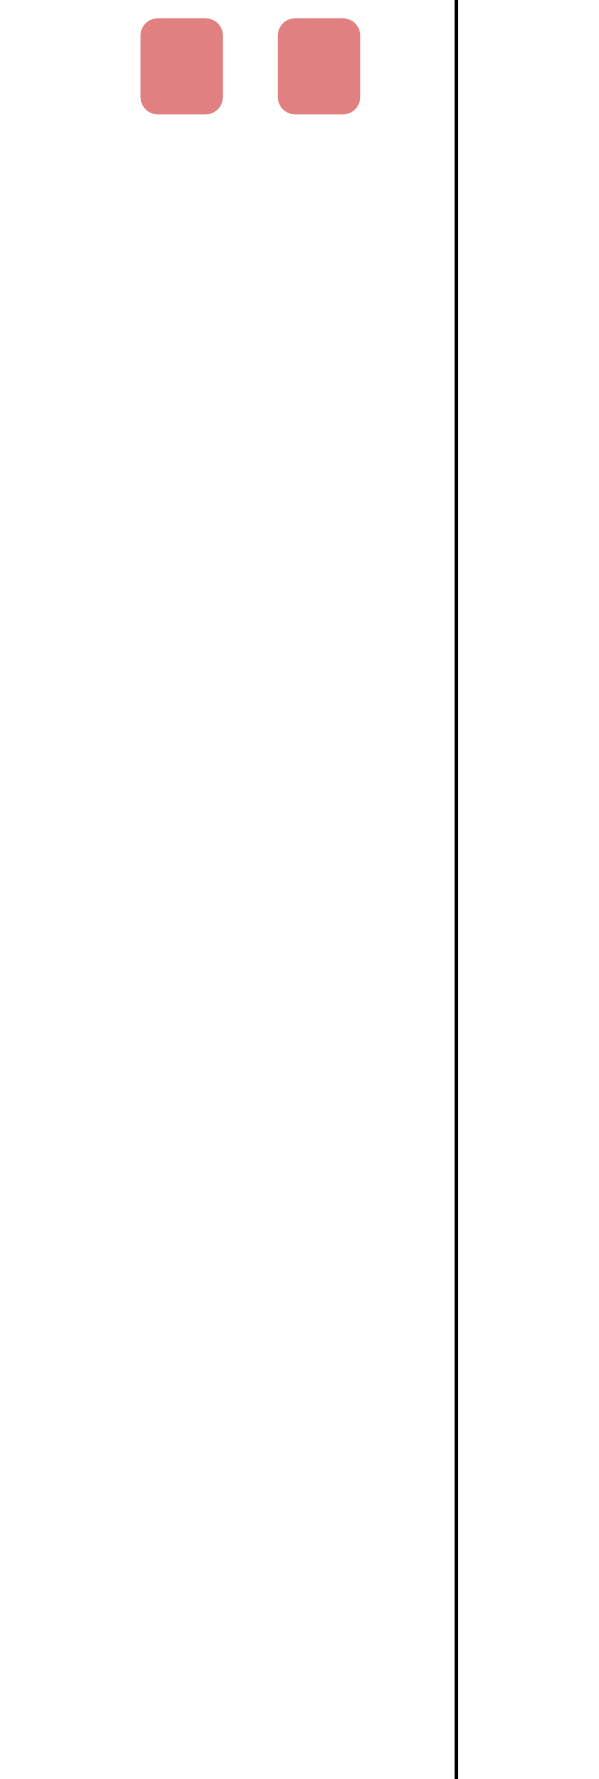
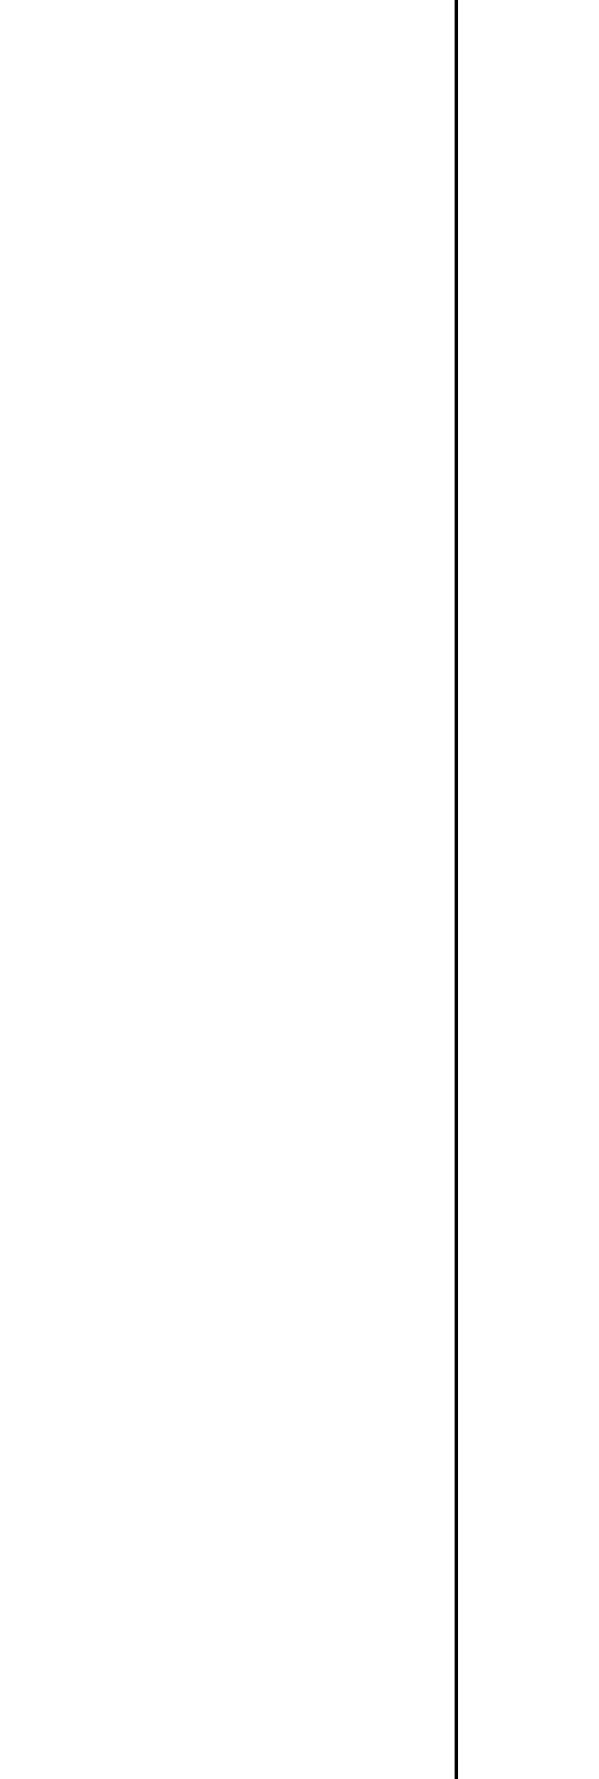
part: (250, 66) -> none

